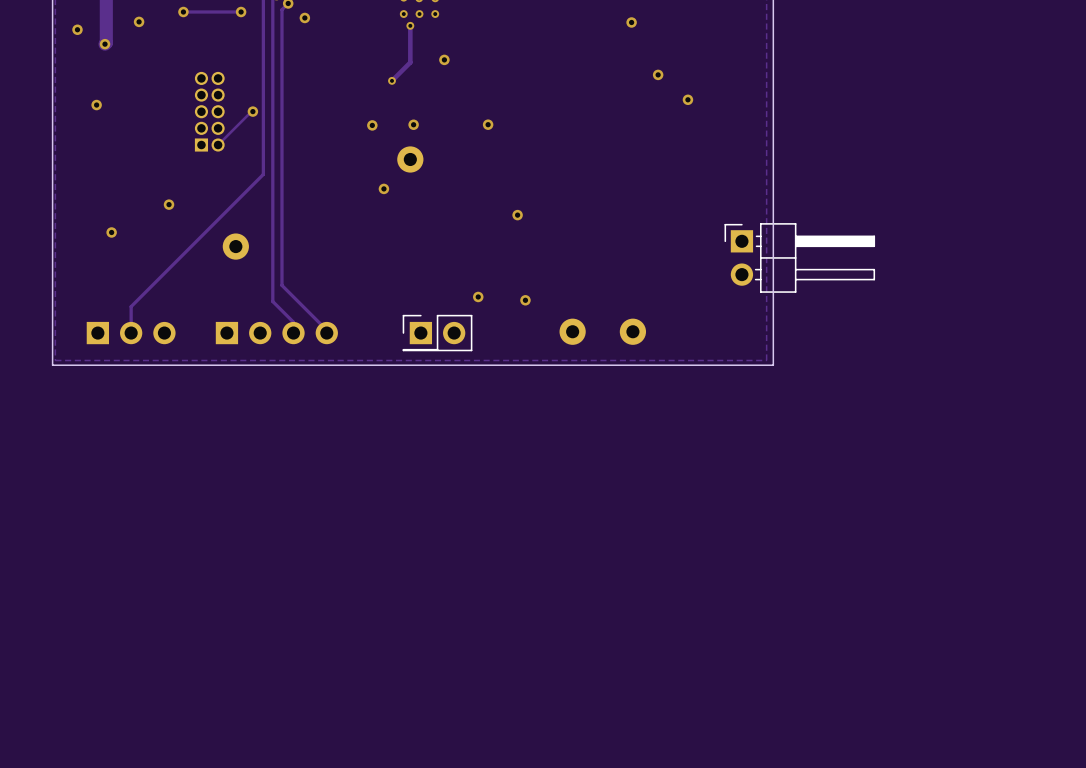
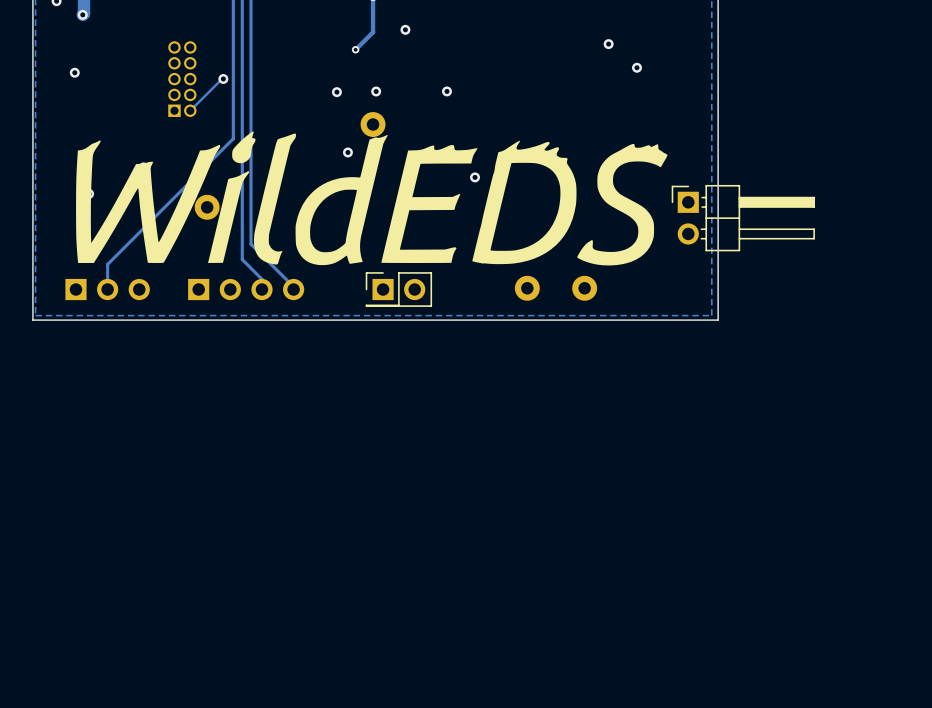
drawing: none -> [76, 131, 668, 266]

